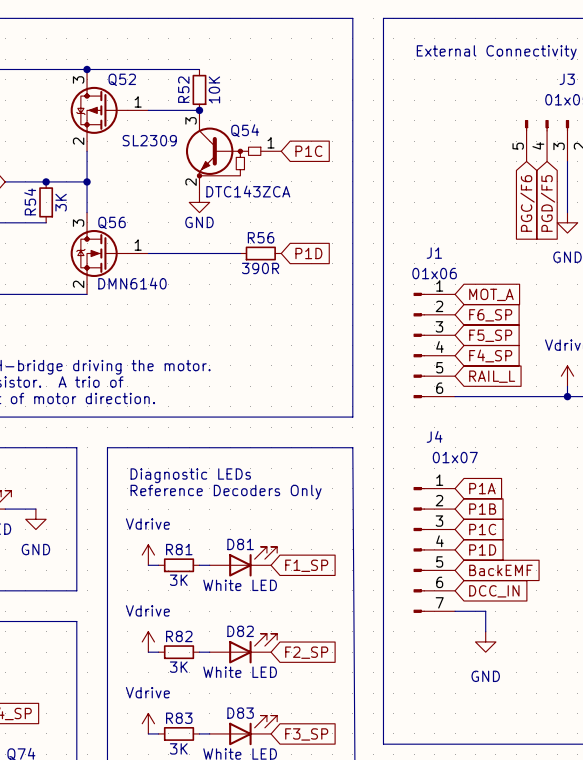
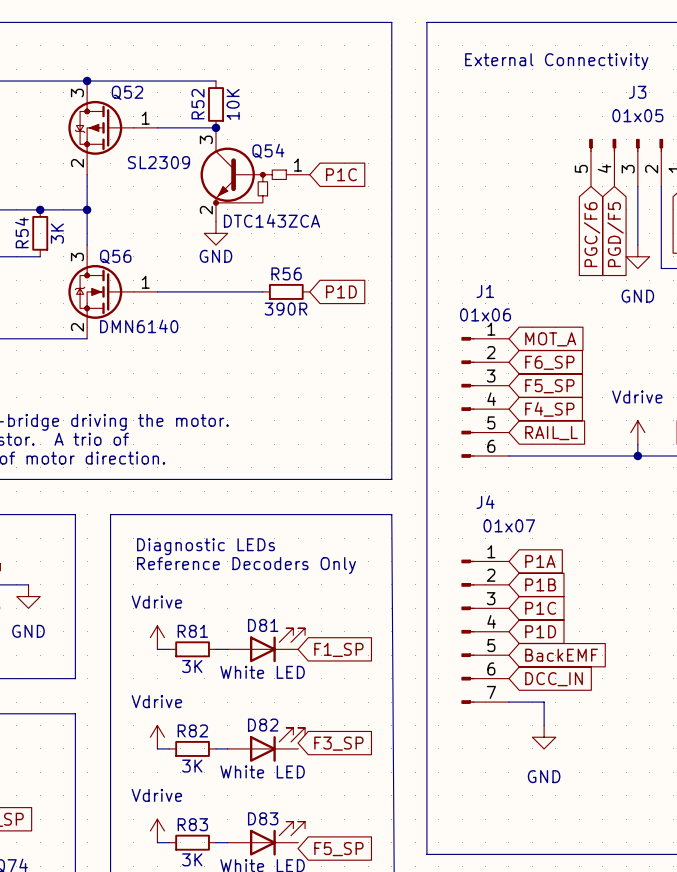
global label: F2_SP (306, 652) -> F3_SP (338, 743)
global label: F3_SP (306, 734) -> F5_SP (338, 849)

